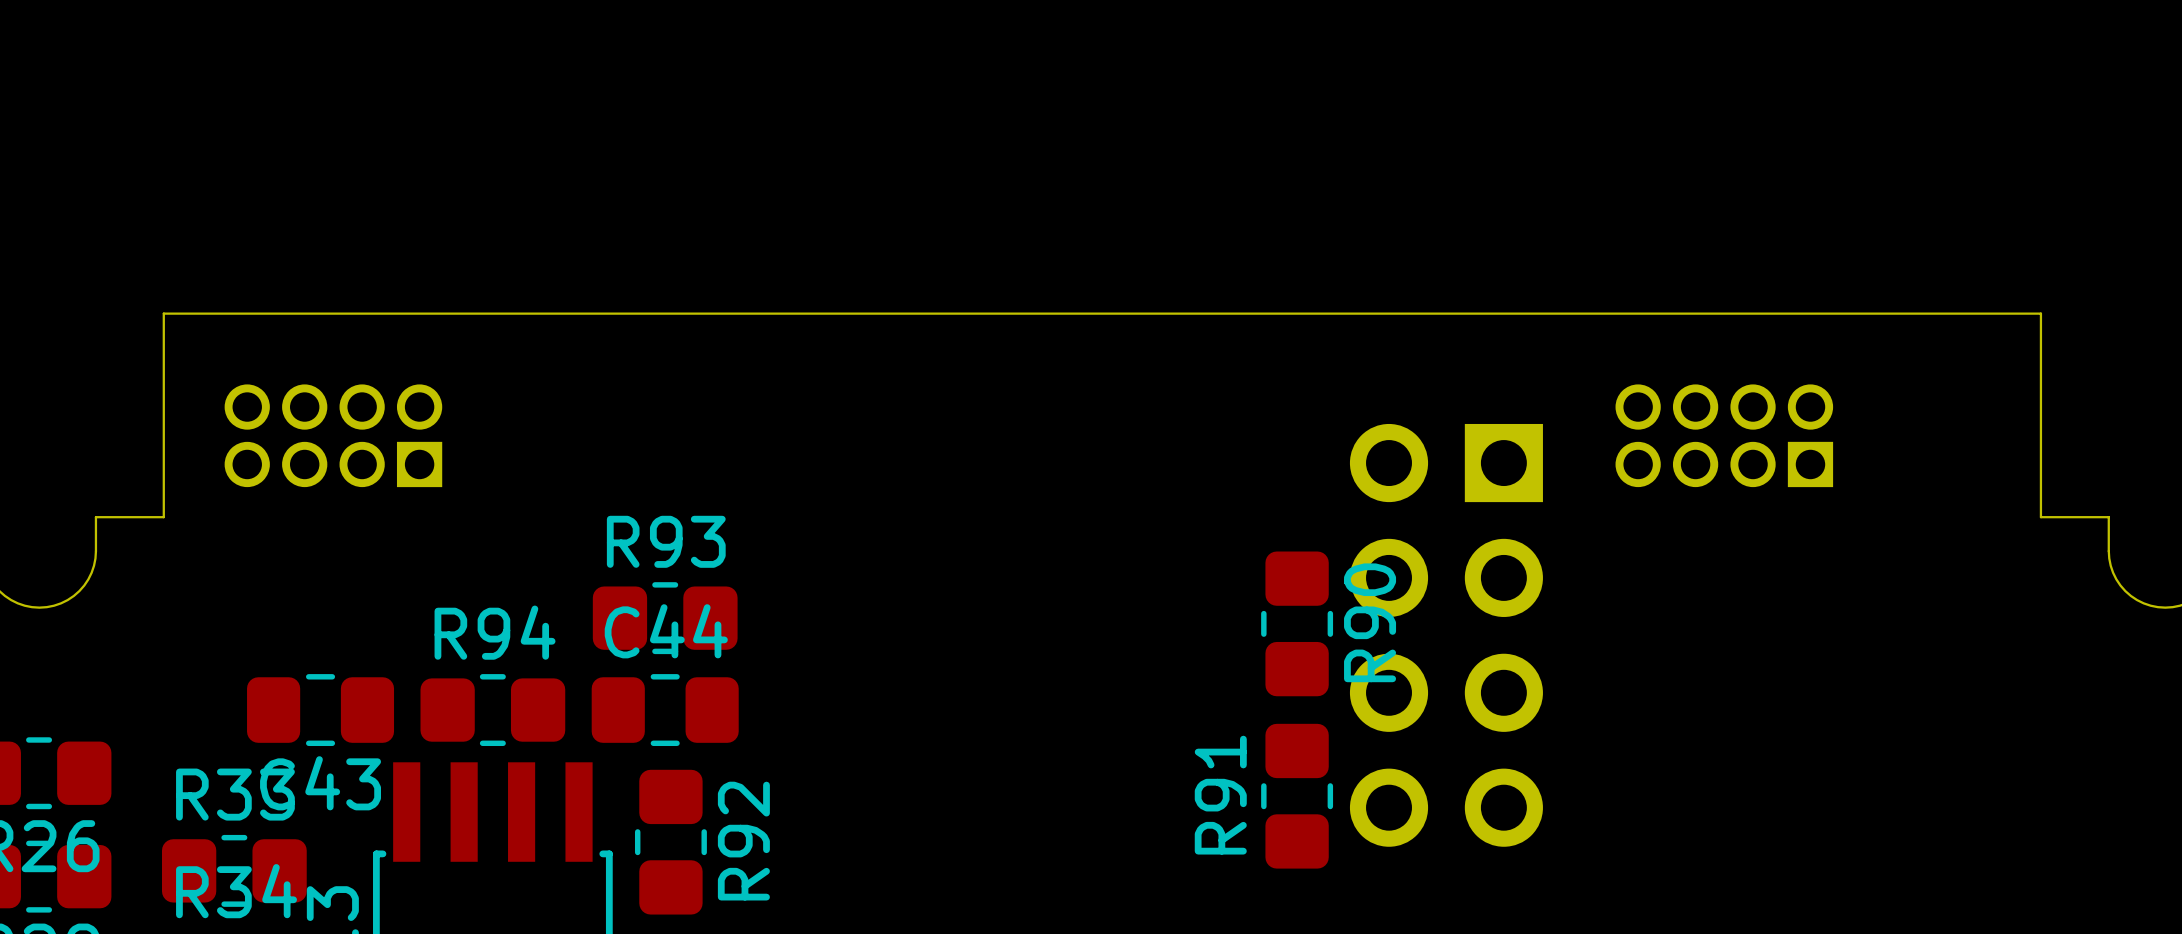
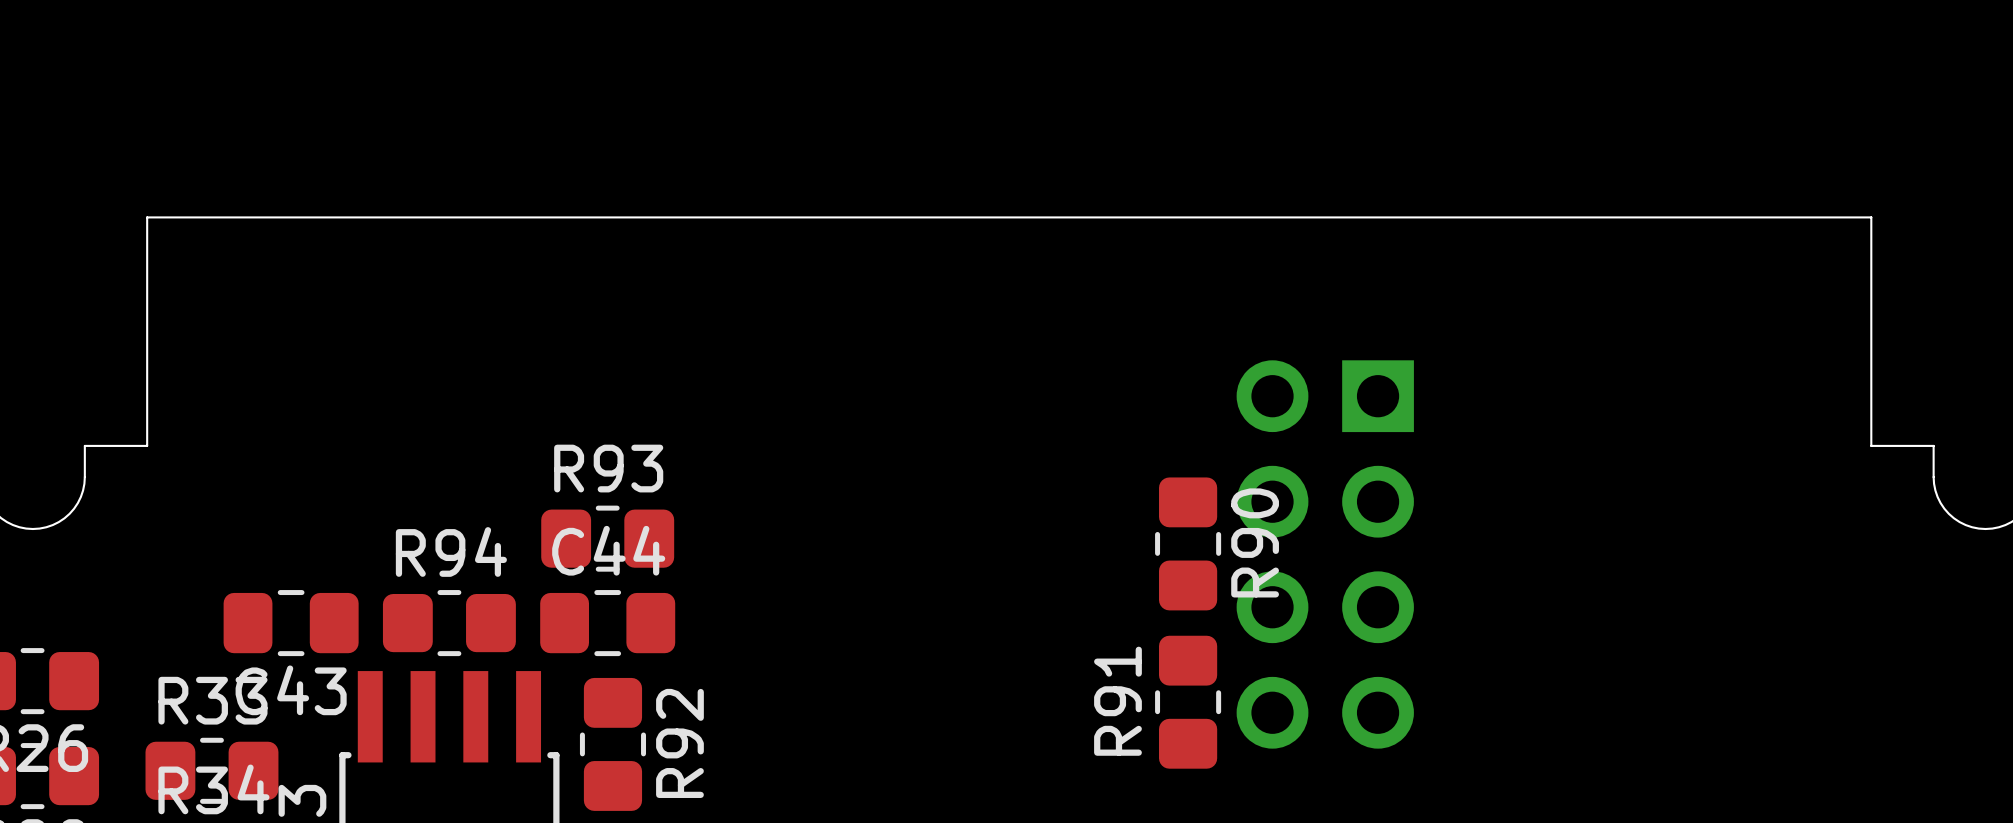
board edge: (163, 313) (2040, 313) -> (147, 258) (147, 217) (1871, 217) (1871, 258)
part: (333, 435) -> none
part: (1724, 435) -> none

